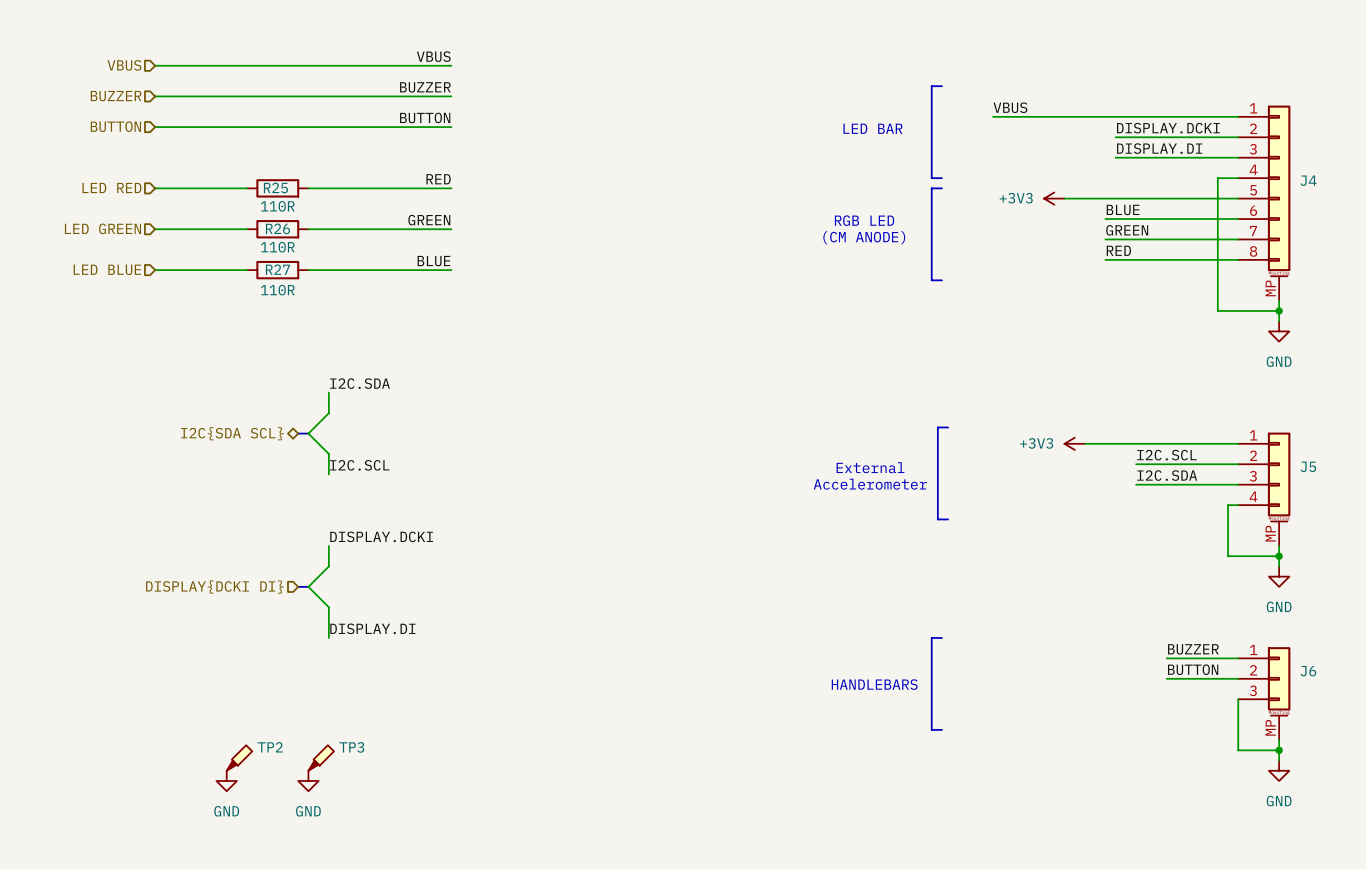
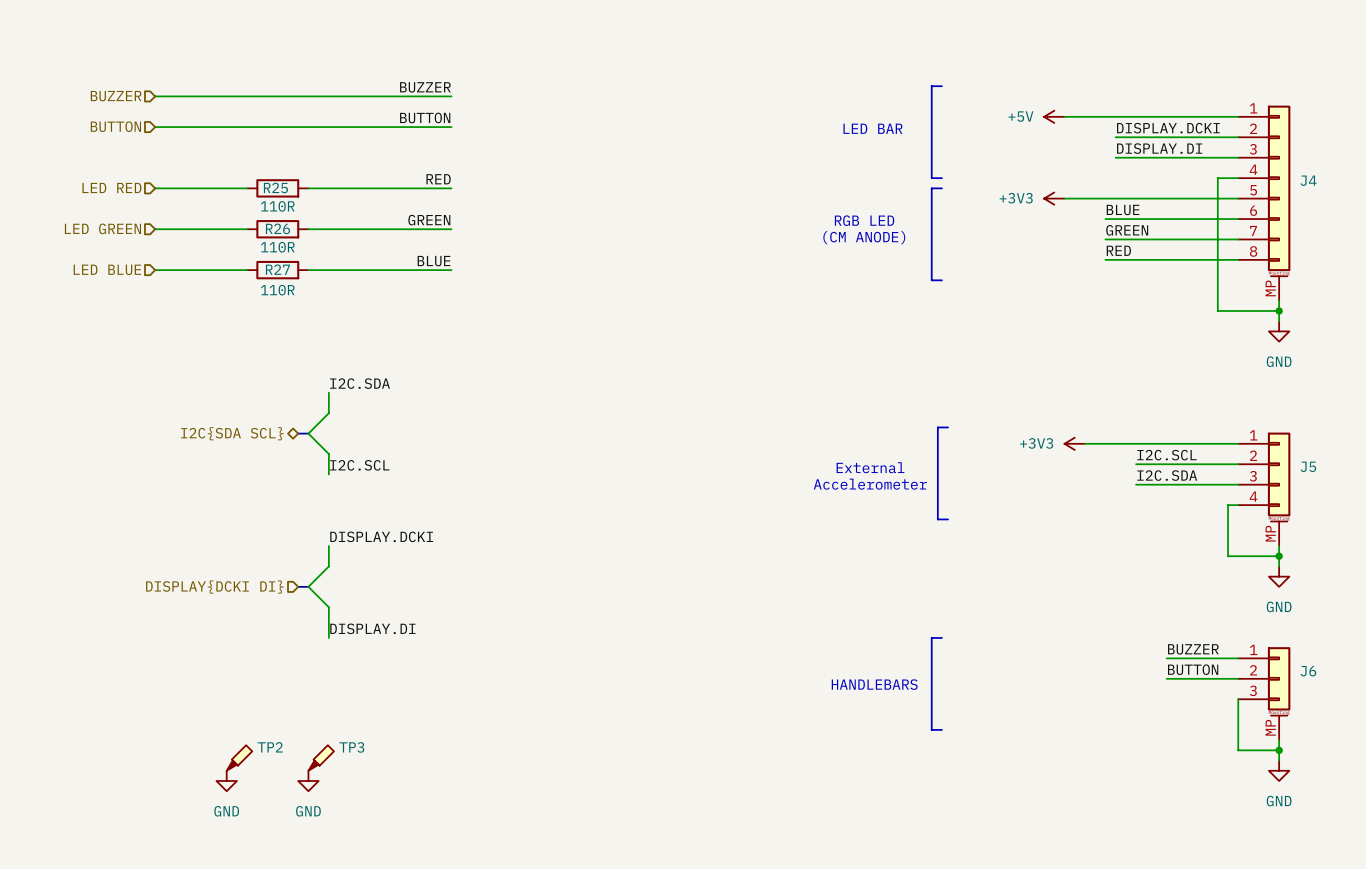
label: VBUS (433, 56) -> none
hierarchical label: VBUS (124, 65) -> none
wire: (155, 65) (451, 65) -> none
label: VBUS (1010, 107) -> none
wire: (993, 116) (1064, 116) -> none
power symbol: none -> +5V (1054, 116)

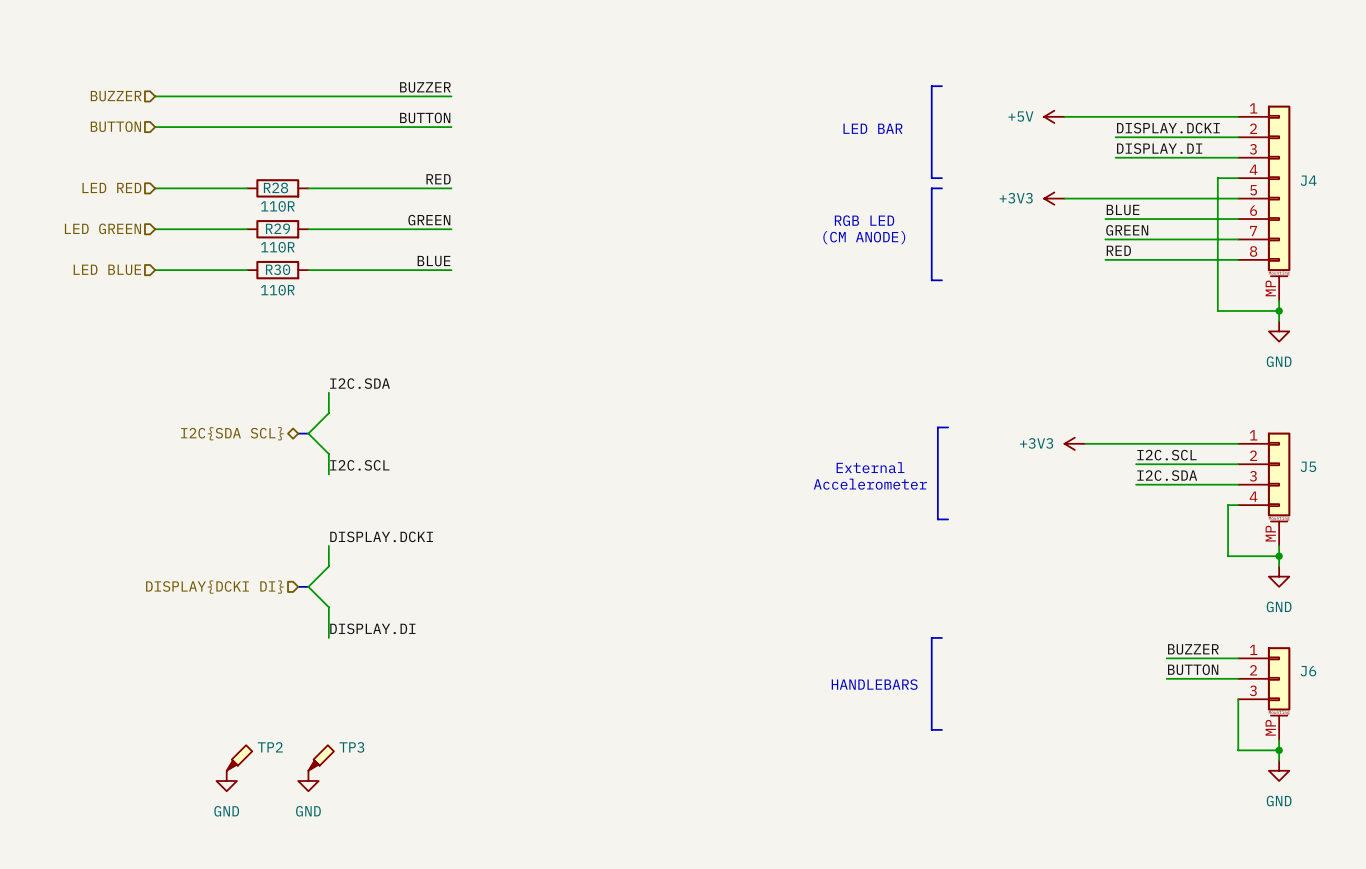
R25 name: R25 (275, 187) -> R28 (276, 187)
R26 name: R26 (277, 228) -> R29 (277, 228)
R27 name: R27 (277, 269) -> R30 (278, 269)

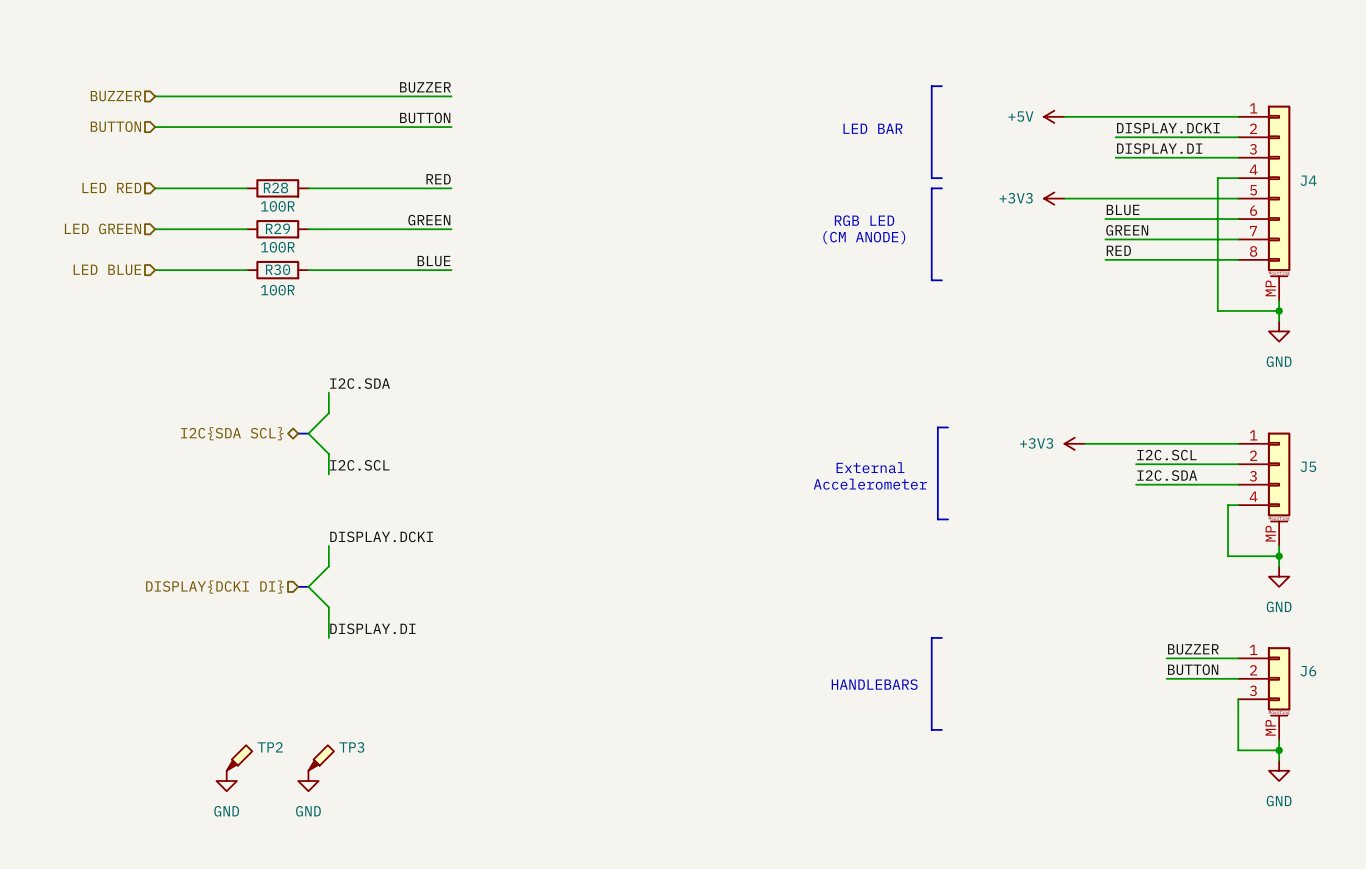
R28 value: 110R (277, 206) -> 100R (277, 206)
R29 value: 110R (277, 247) -> 100R (277, 247)
R30 value: 110R (277, 290) -> 100R (277, 290)

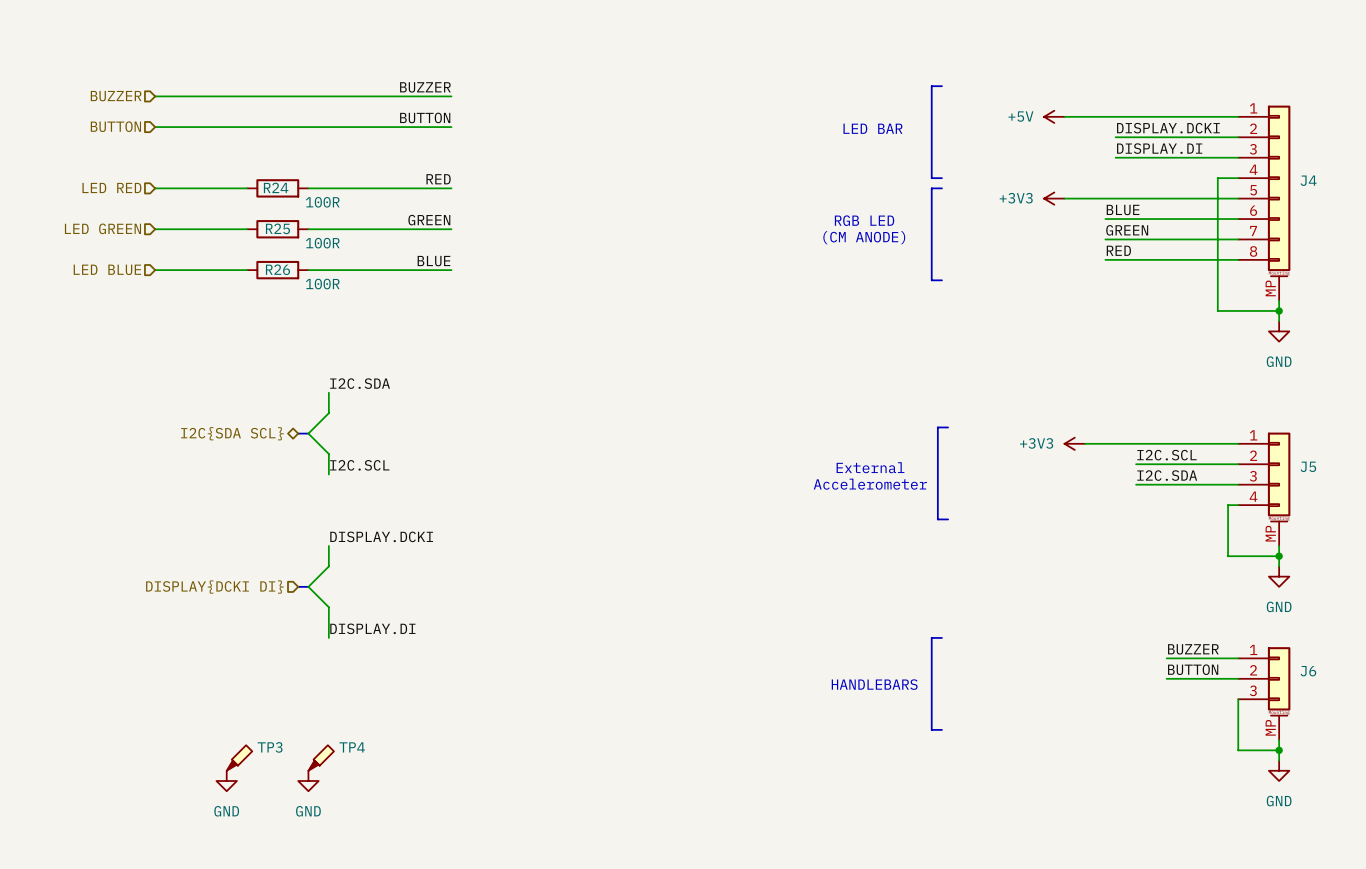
R28 name: R28 (276, 187) -> R24 (276, 187)
R28 value position: 100R (277, 206) -> 100R (322, 202)
R29 name: R29 (277, 228) -> R25 (277, 228)
R29 value position: 100R (277, 247) -> 100R (322, 243)
R30 name: R30 (278, 269) -> R26 (277, 269)
R30 value position: 100R (277, 290) -> 100R (322, 284)
TP2 name: TP2 (270, 747) -> TP3 (270, 747)
TP3 name: TP3 (351, 747) -> TP4 (352, 747)

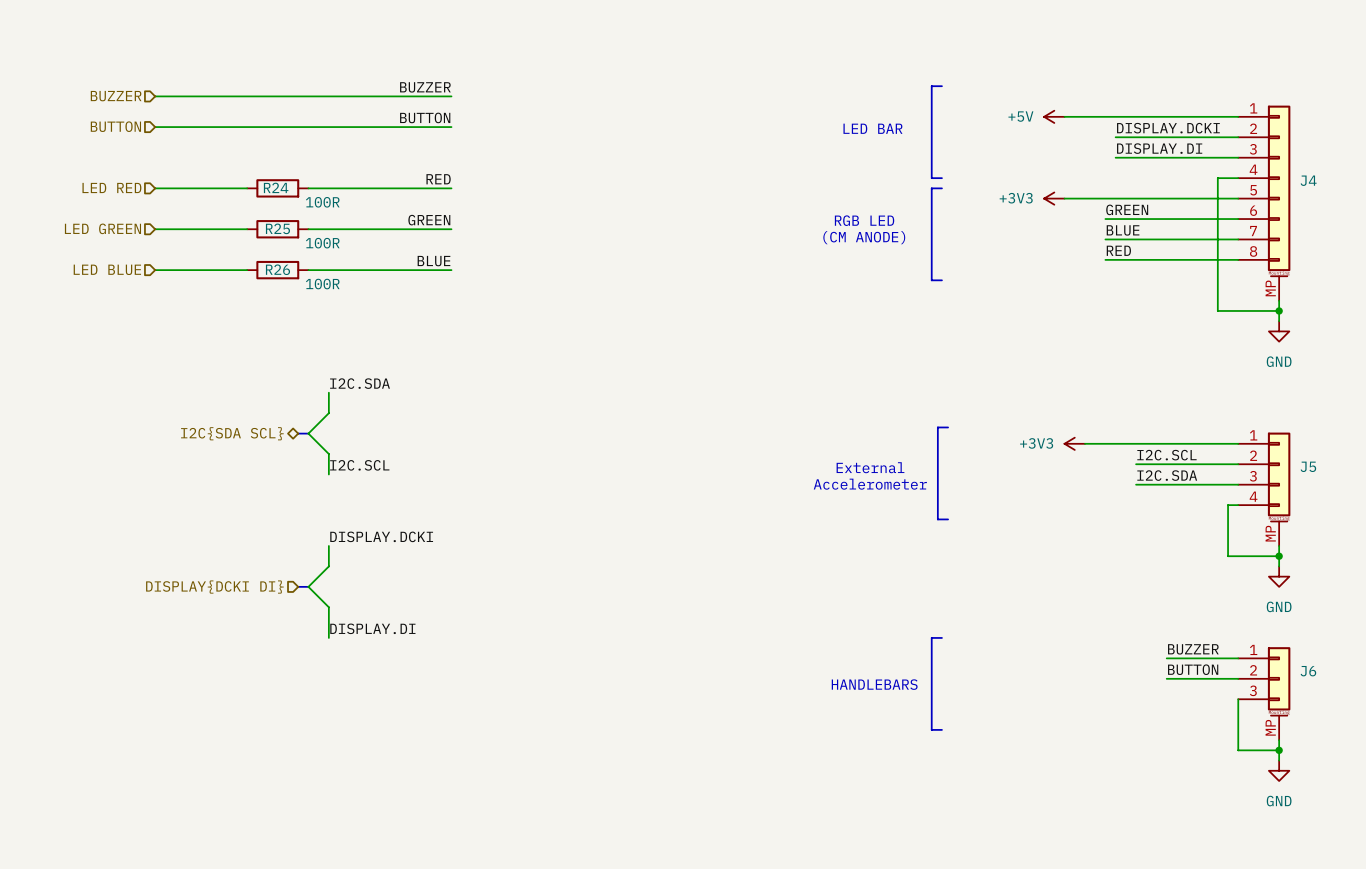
label: BLUE (1123, 209) -> GREEN (1127, 209)
label: GREEN (1127, 230) -> BLUE (1123, 230)
TP3: (239, 758) -> none
TP4: (321, 758) -> none
power symbol: GND (226, 781) -> none
power symbol: GND (308, 781) -> none

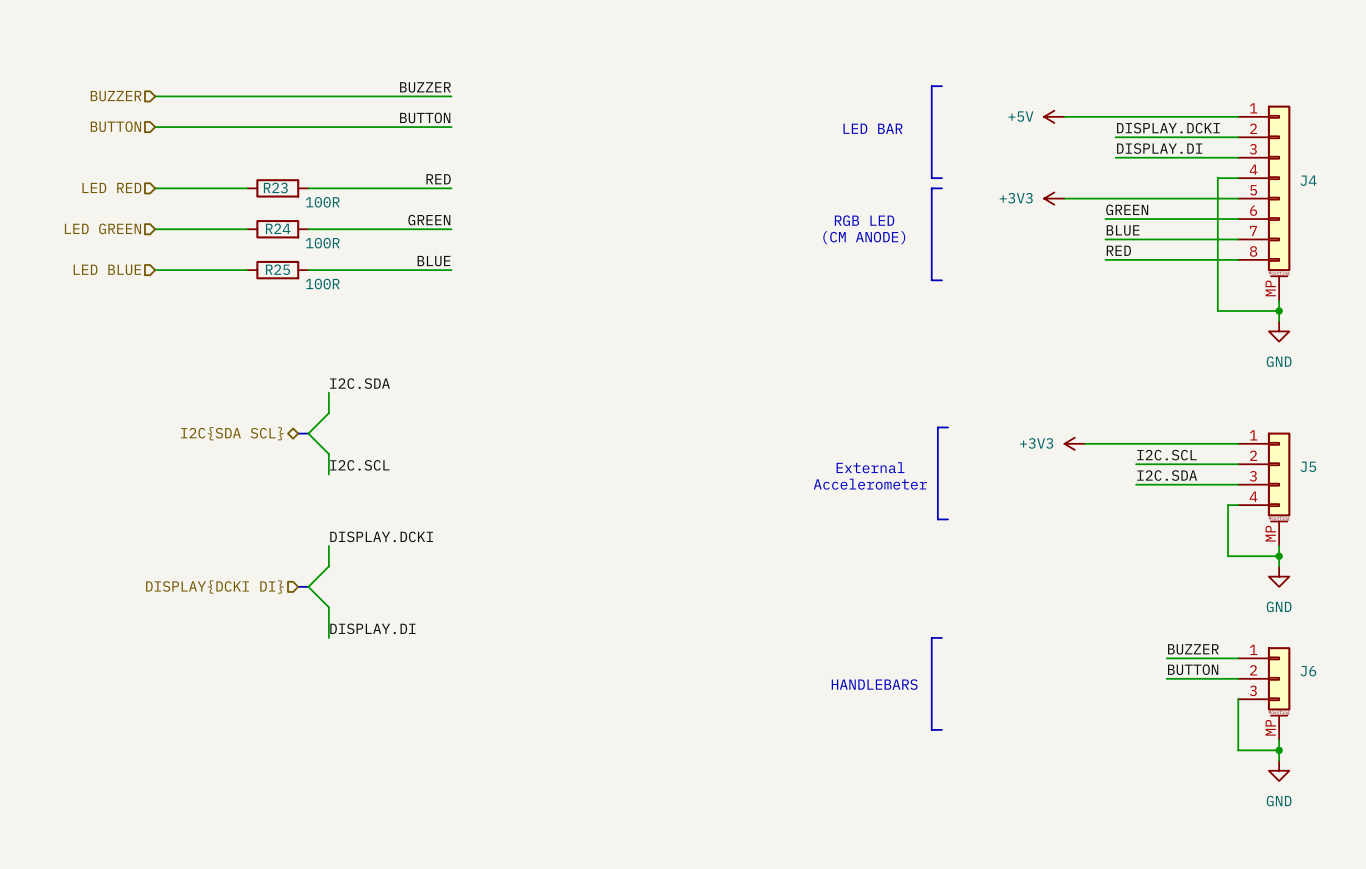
R24 name: R24 (276, 187) -> R23 (275, 187)
R25 name: R25 (277, 228) -> R24 (278, 228)
R26 name: R26 (277, 269) -> R25 (277, 269)

